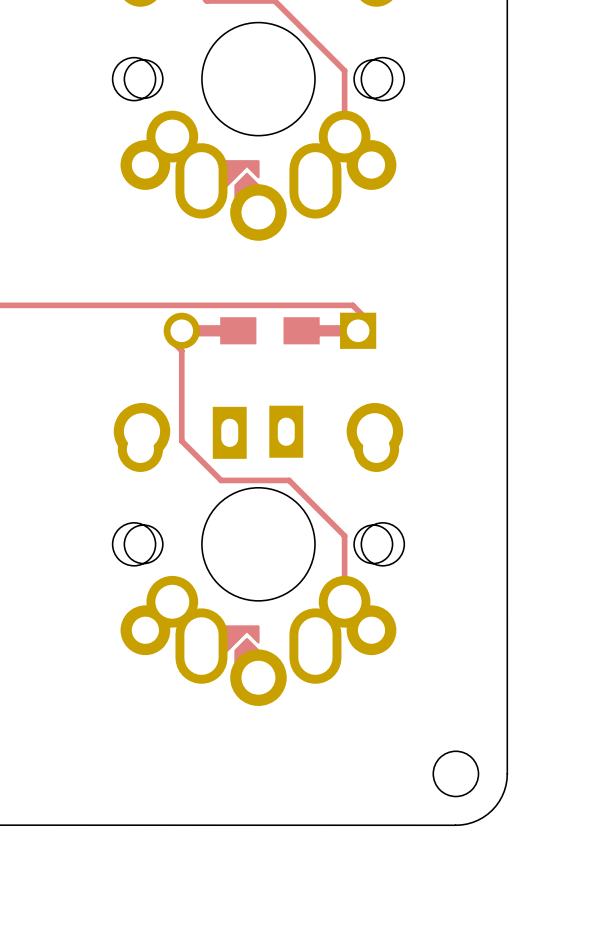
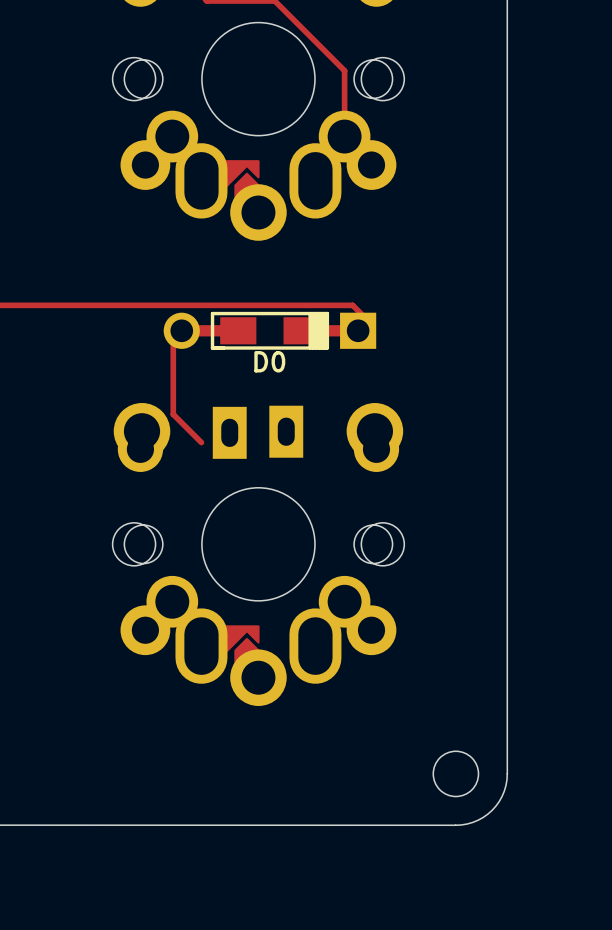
part: (269, 330) -> none
D0: none -> (269, 330)
track: (173, 342) (181, 350) (181, 441) (221, 480) (289, 480) (344, 535) (344, 603) (371, 630) -> (173, 342) (173, 414) (201, 442)

